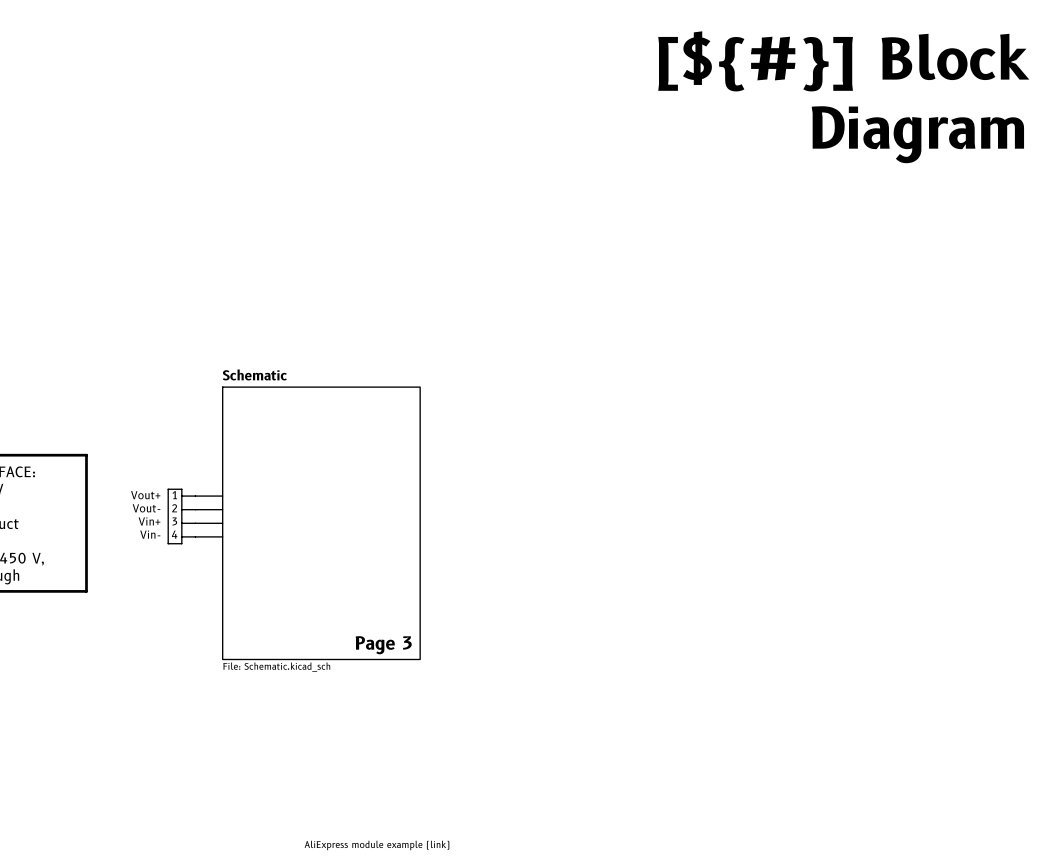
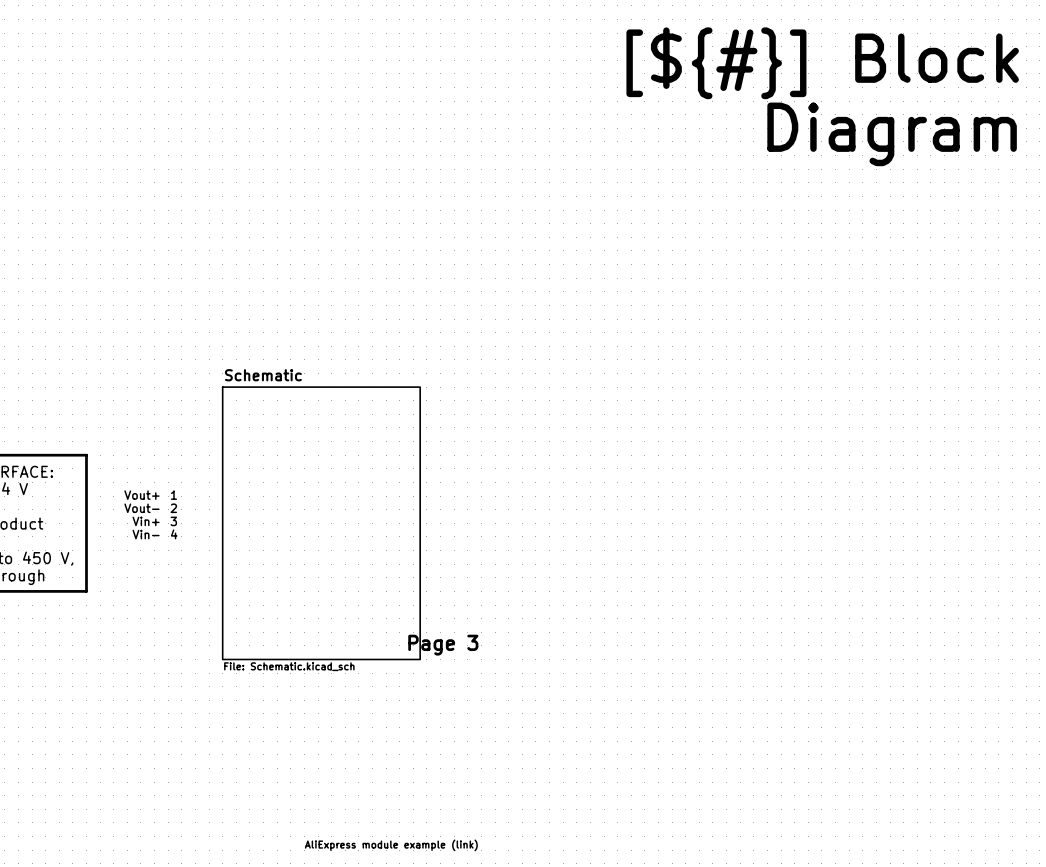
line: (168, 489) (181, 489) (181, 543) (168, 543) (168, 489) -> none
line: (181, 496) (222, 496) -> none
line: (181, 509) (222, 509) -> none
line: (181, 523) (222, 523) -> none
line: (181, 536) (222, 536) -> none
text position: Page 3 (383, 645) -> Page 3 (443, 645)

